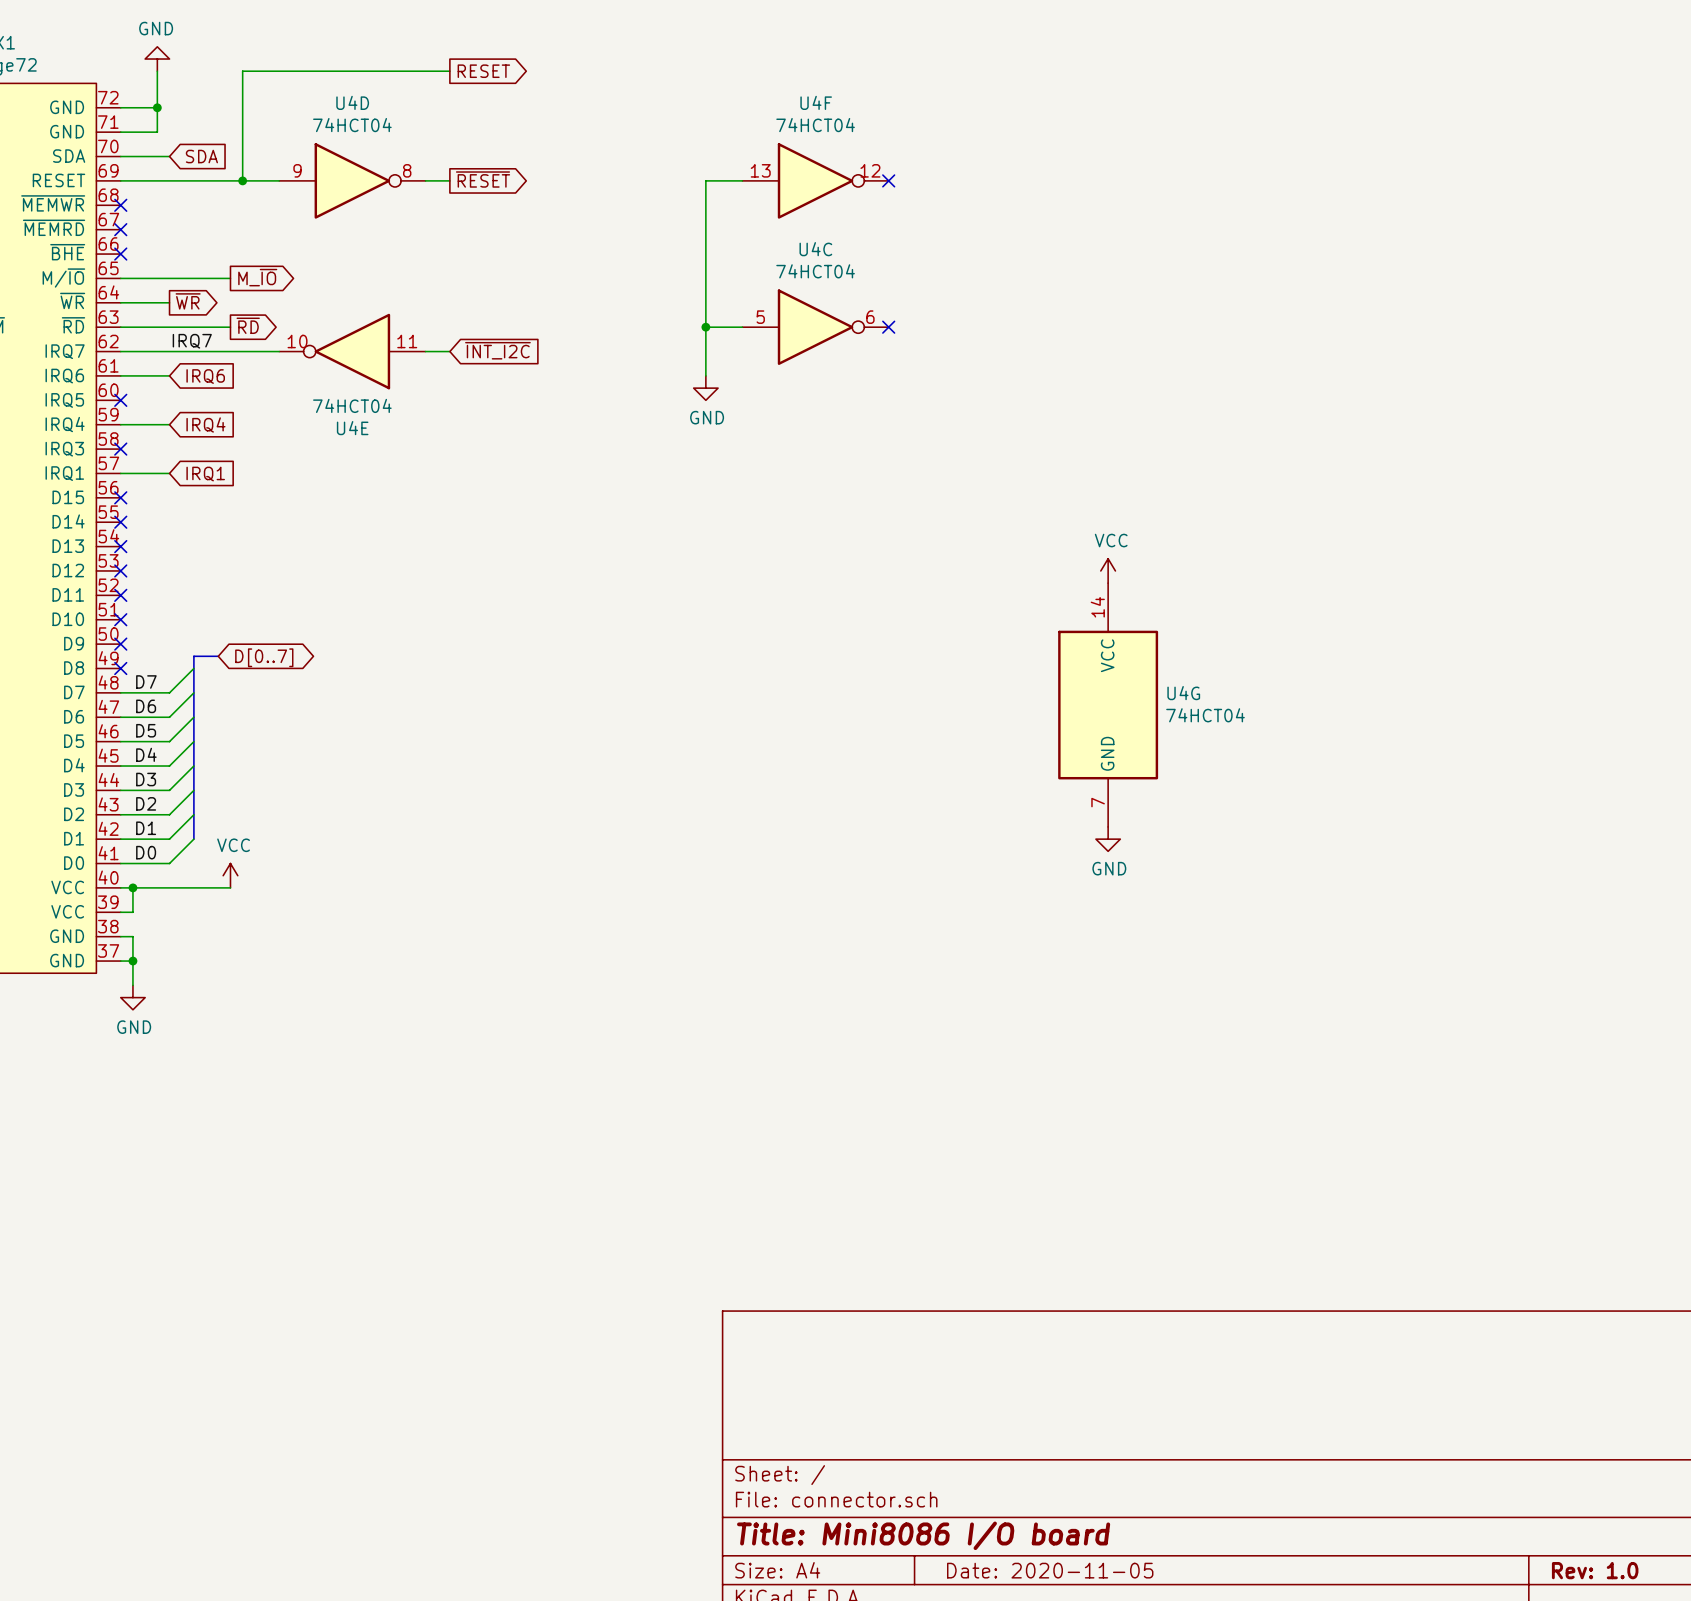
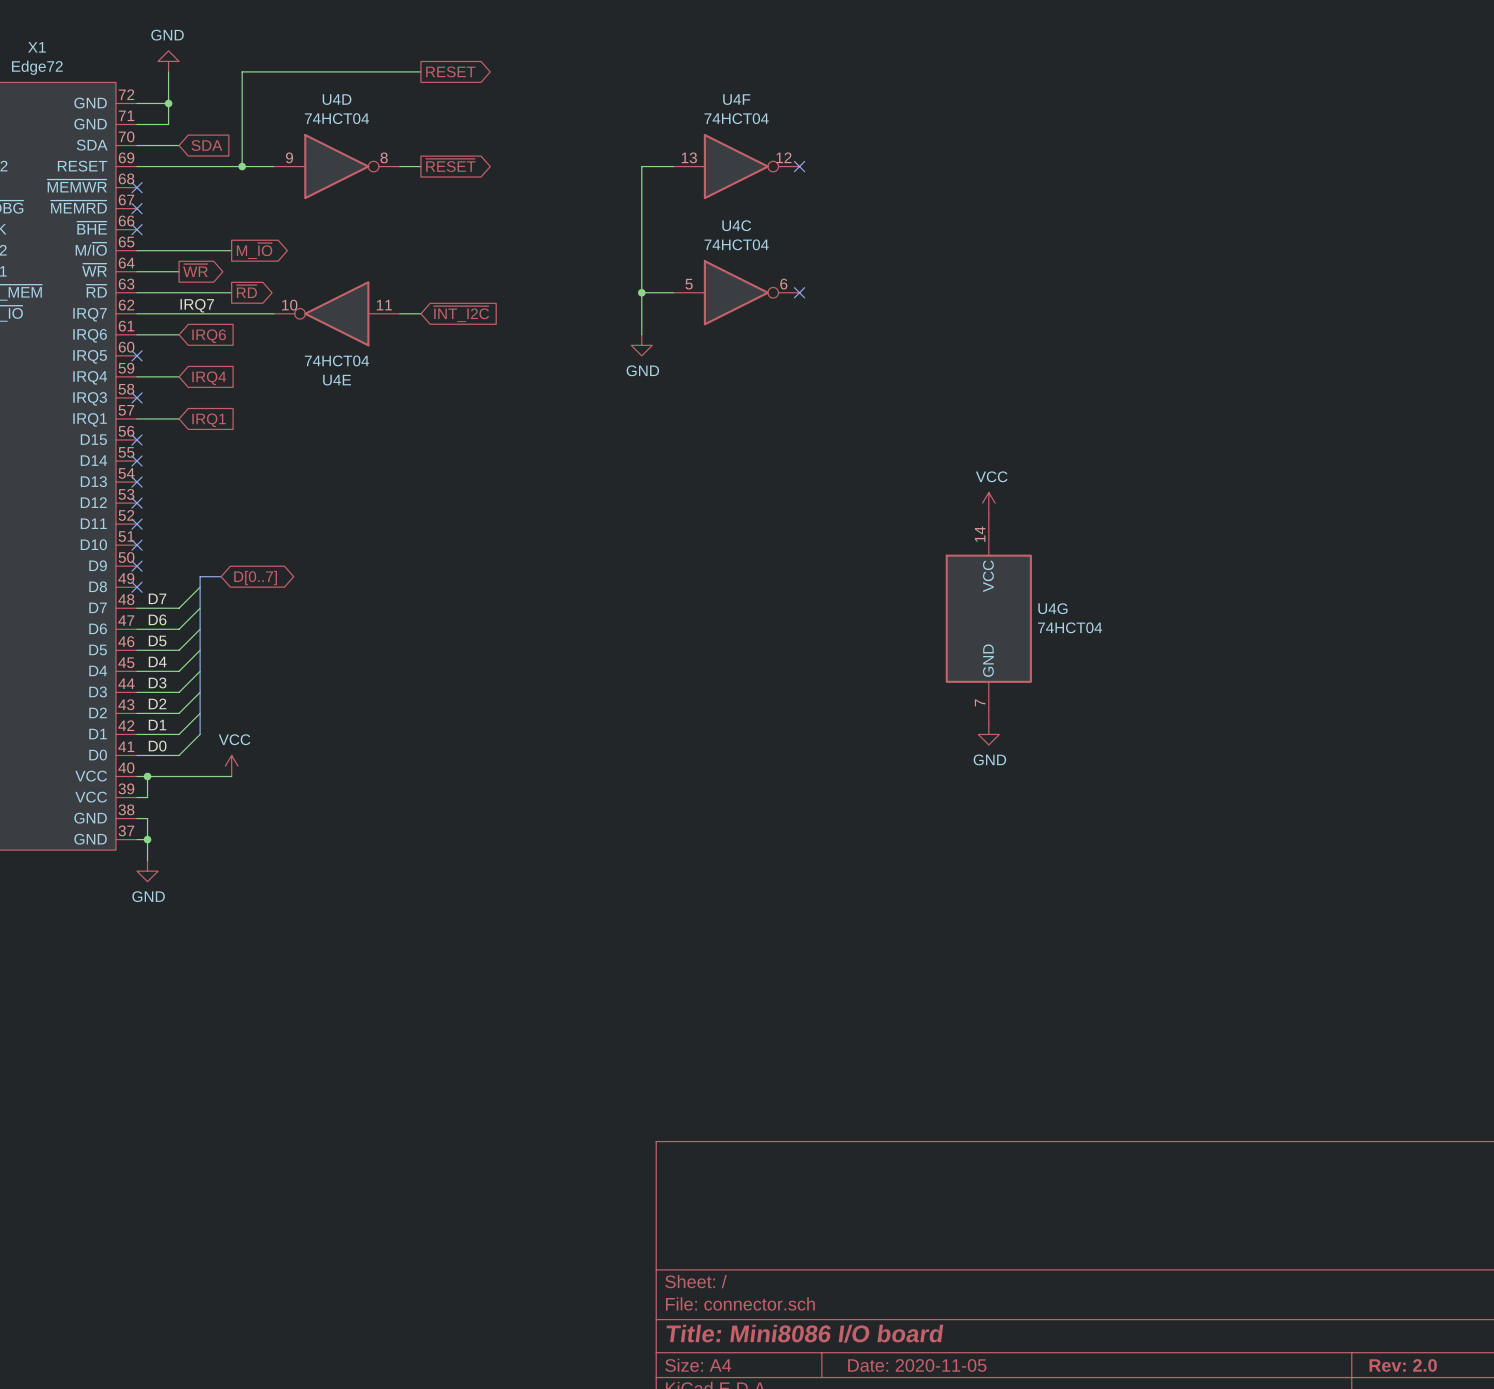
title block: Rev: 1.0 (1595, 1570) -> Rev: 2.0 (1403, 1365)

